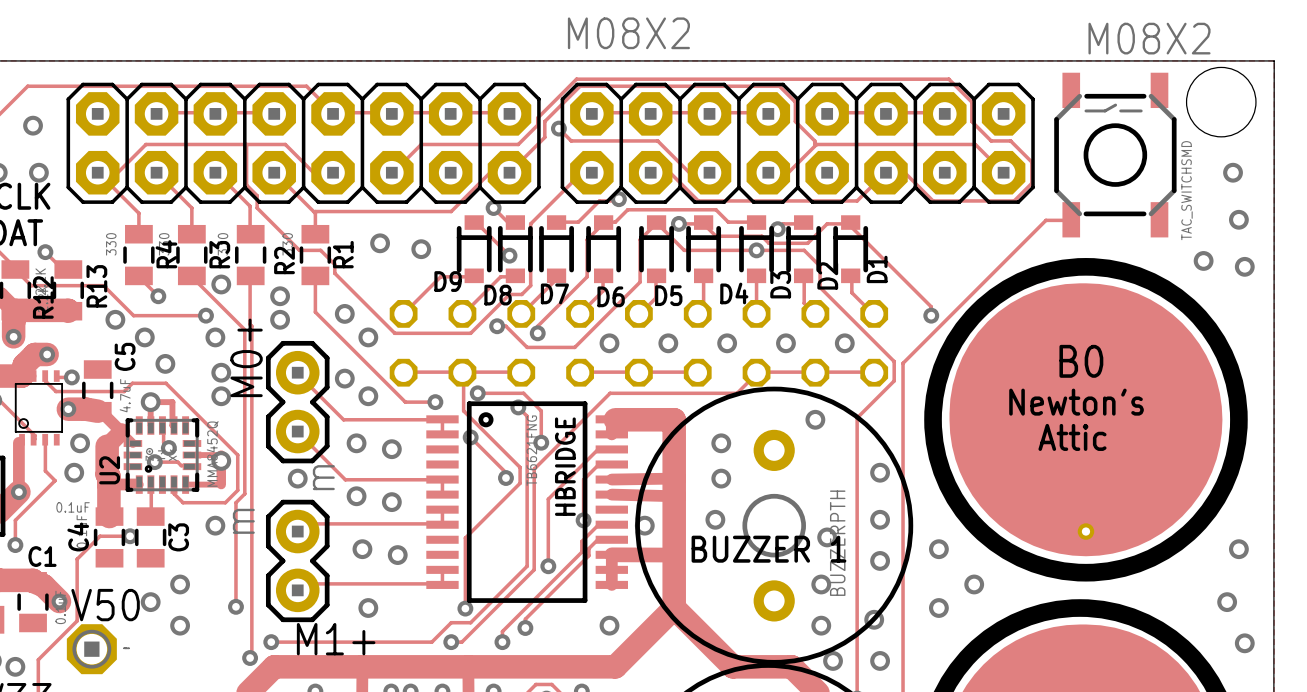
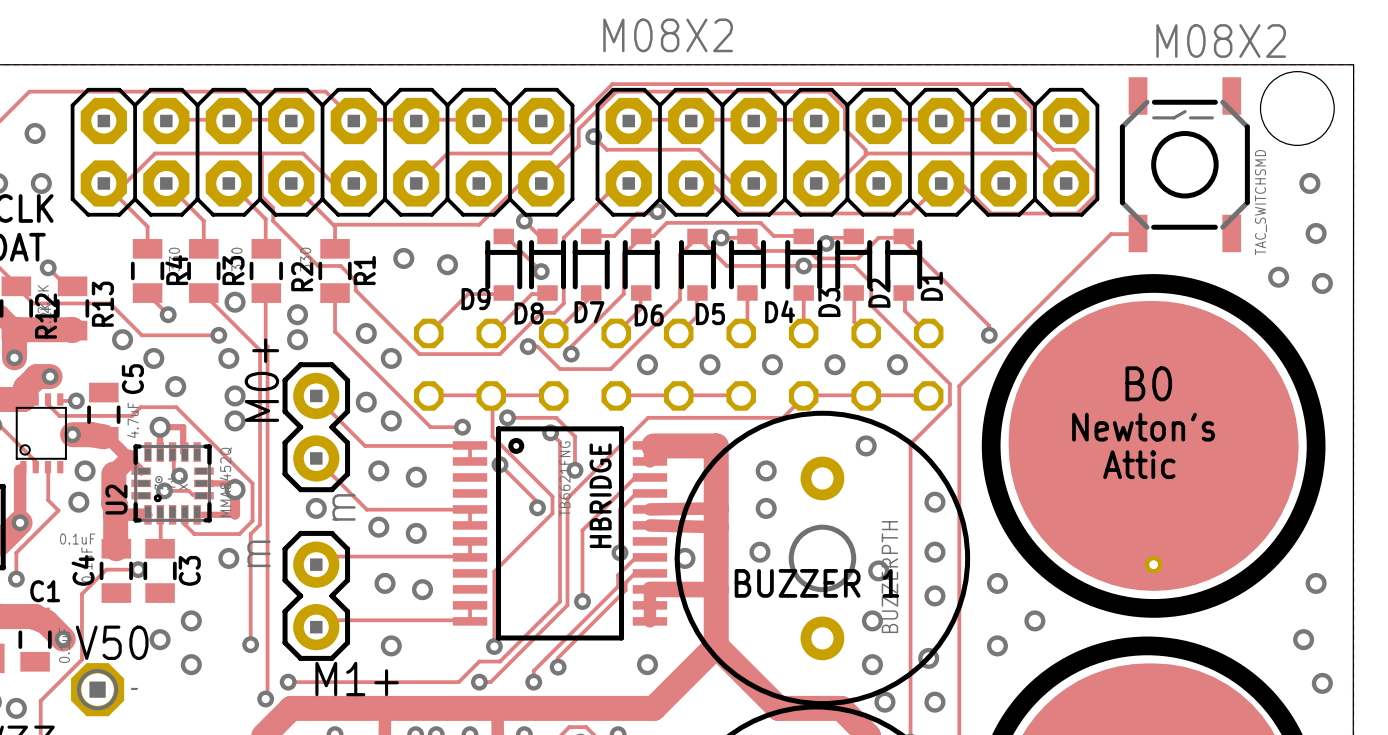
R4 value: 330 (111, 244) -> none

